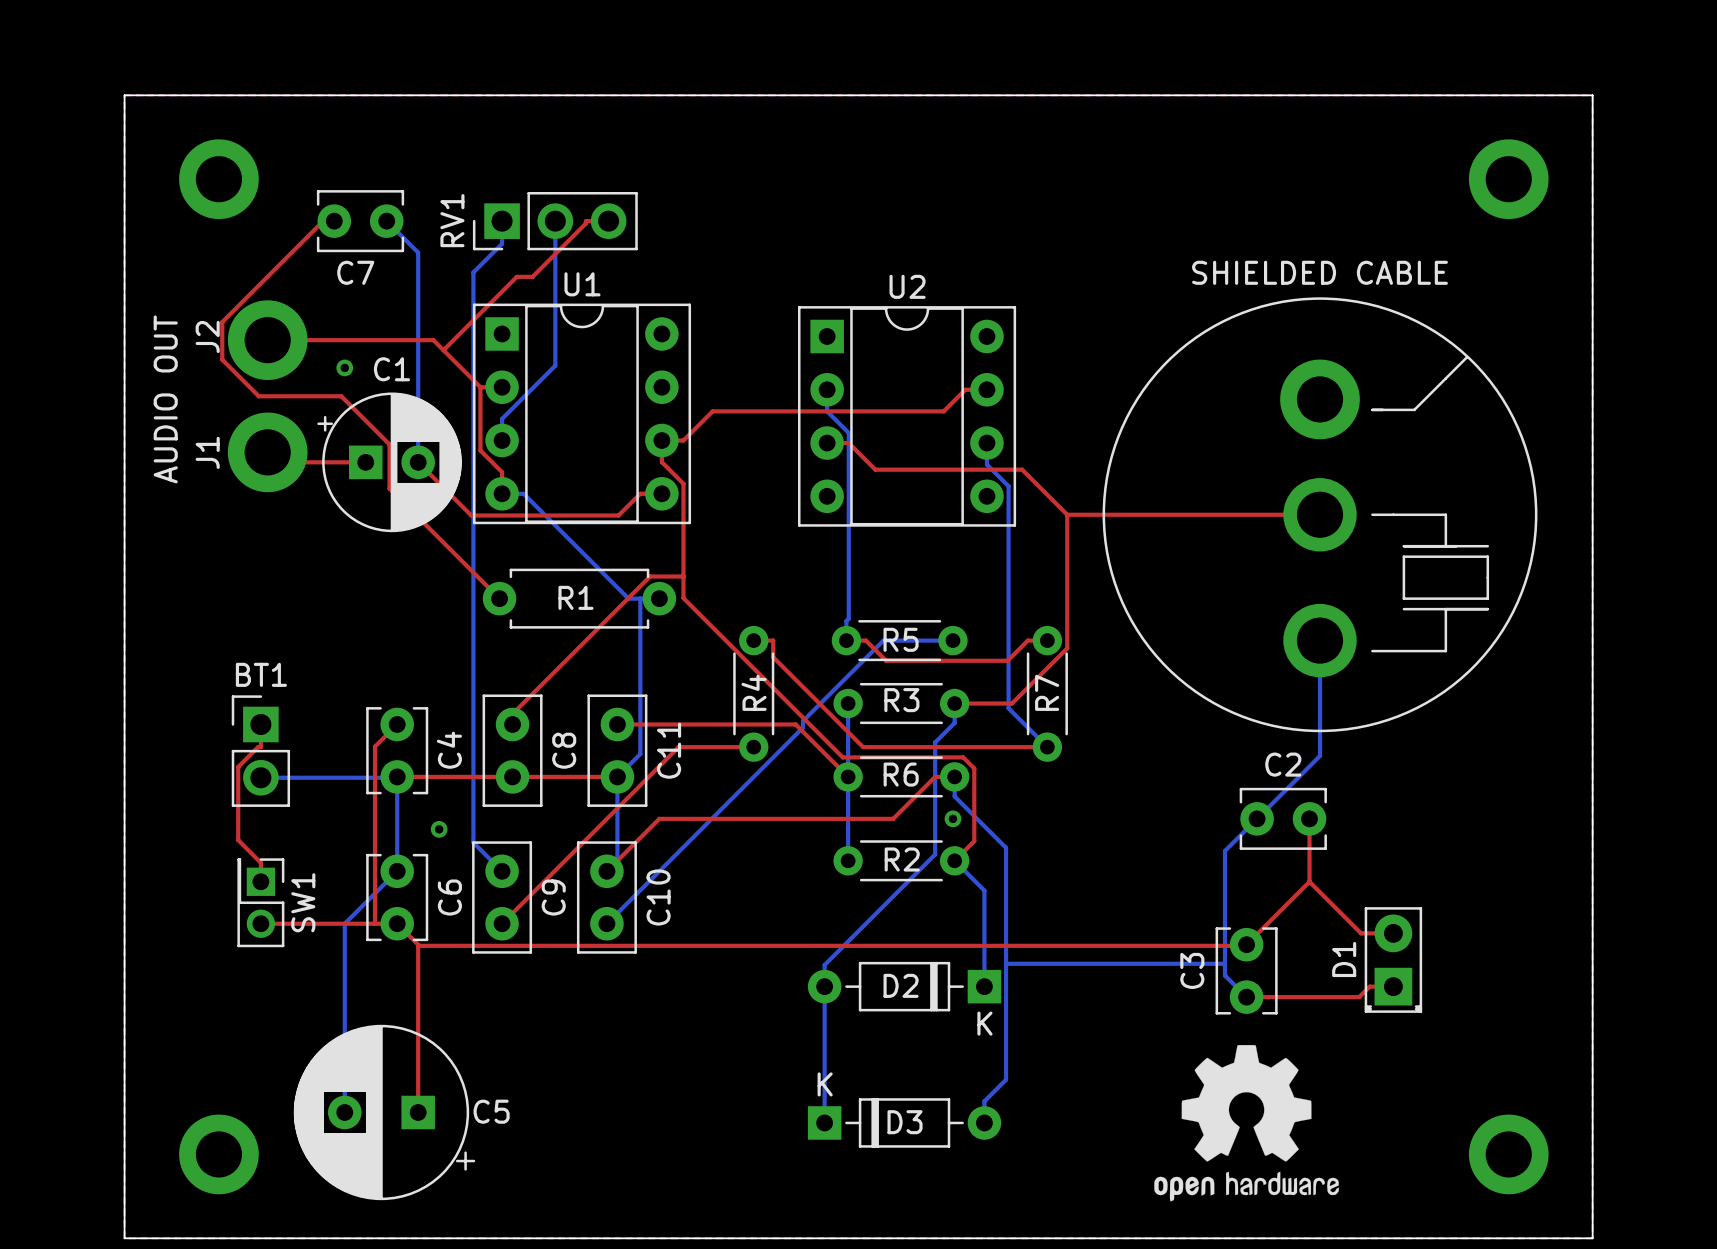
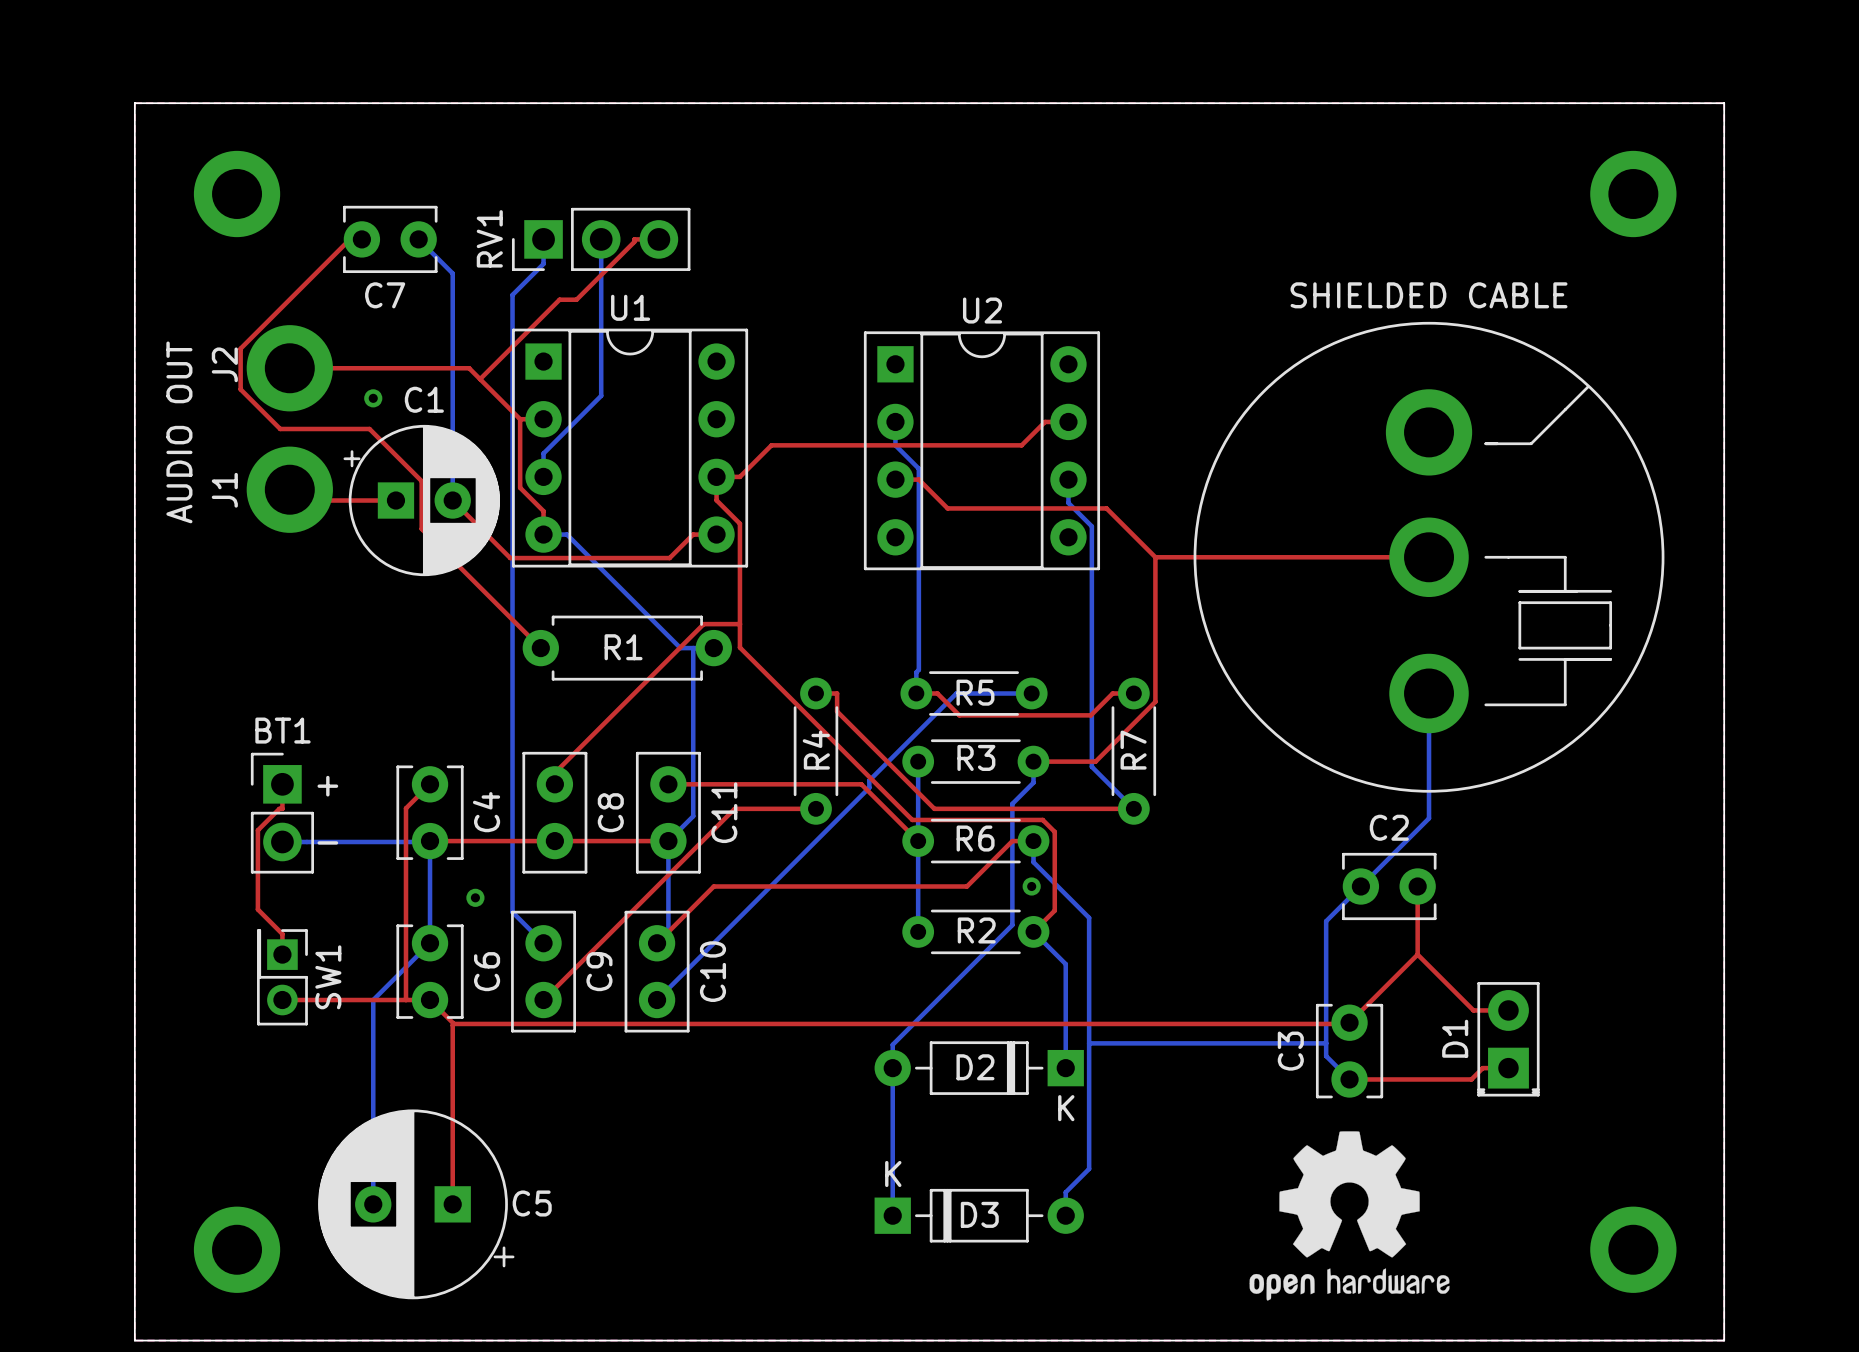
text: none -> + (327, 786)
text: none -> - (327, 842)

